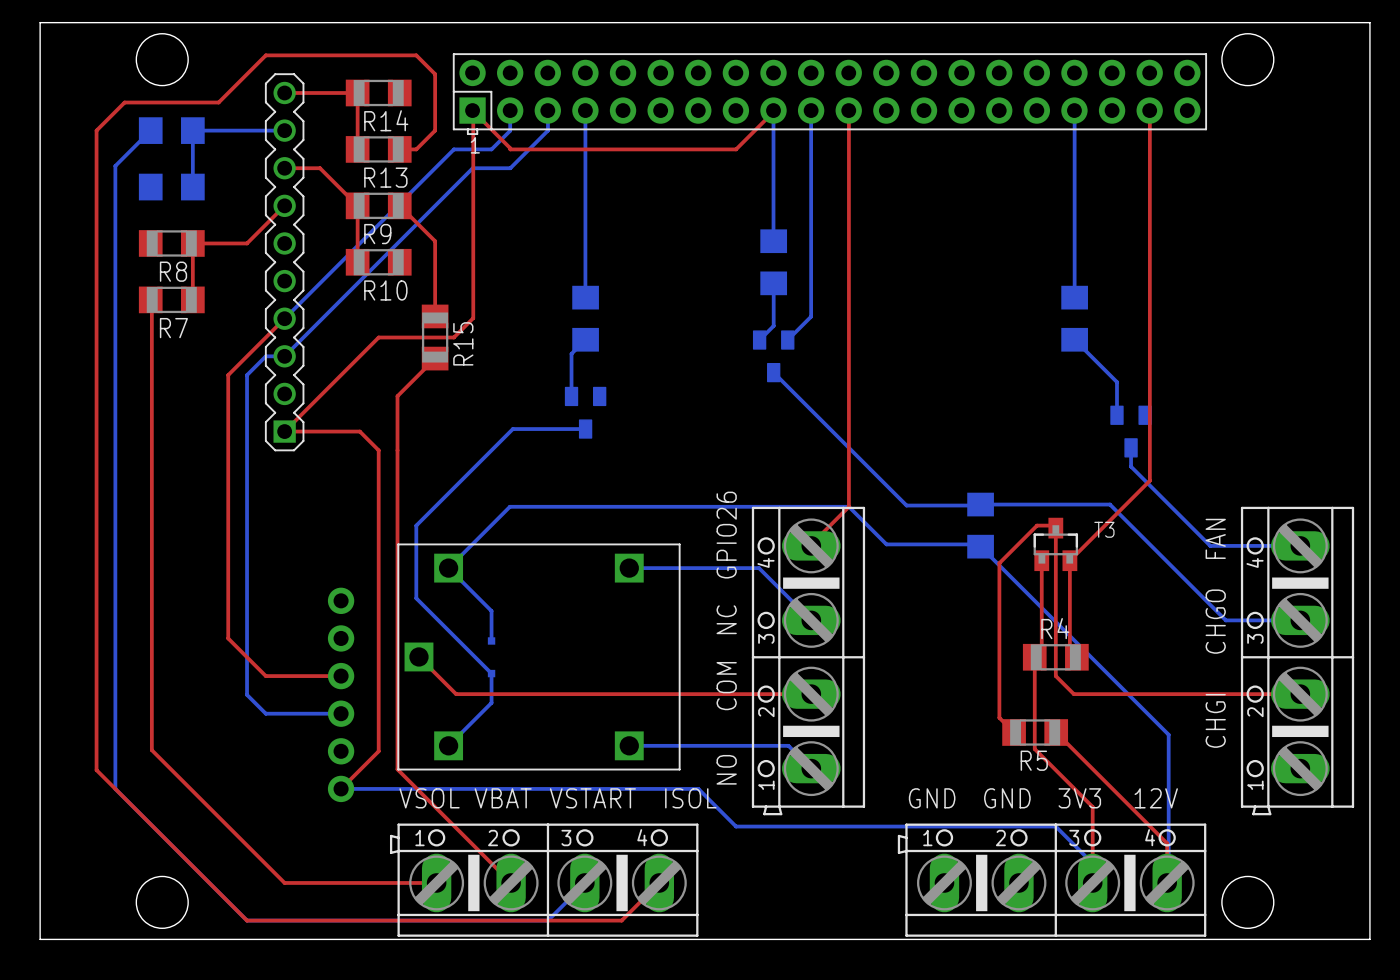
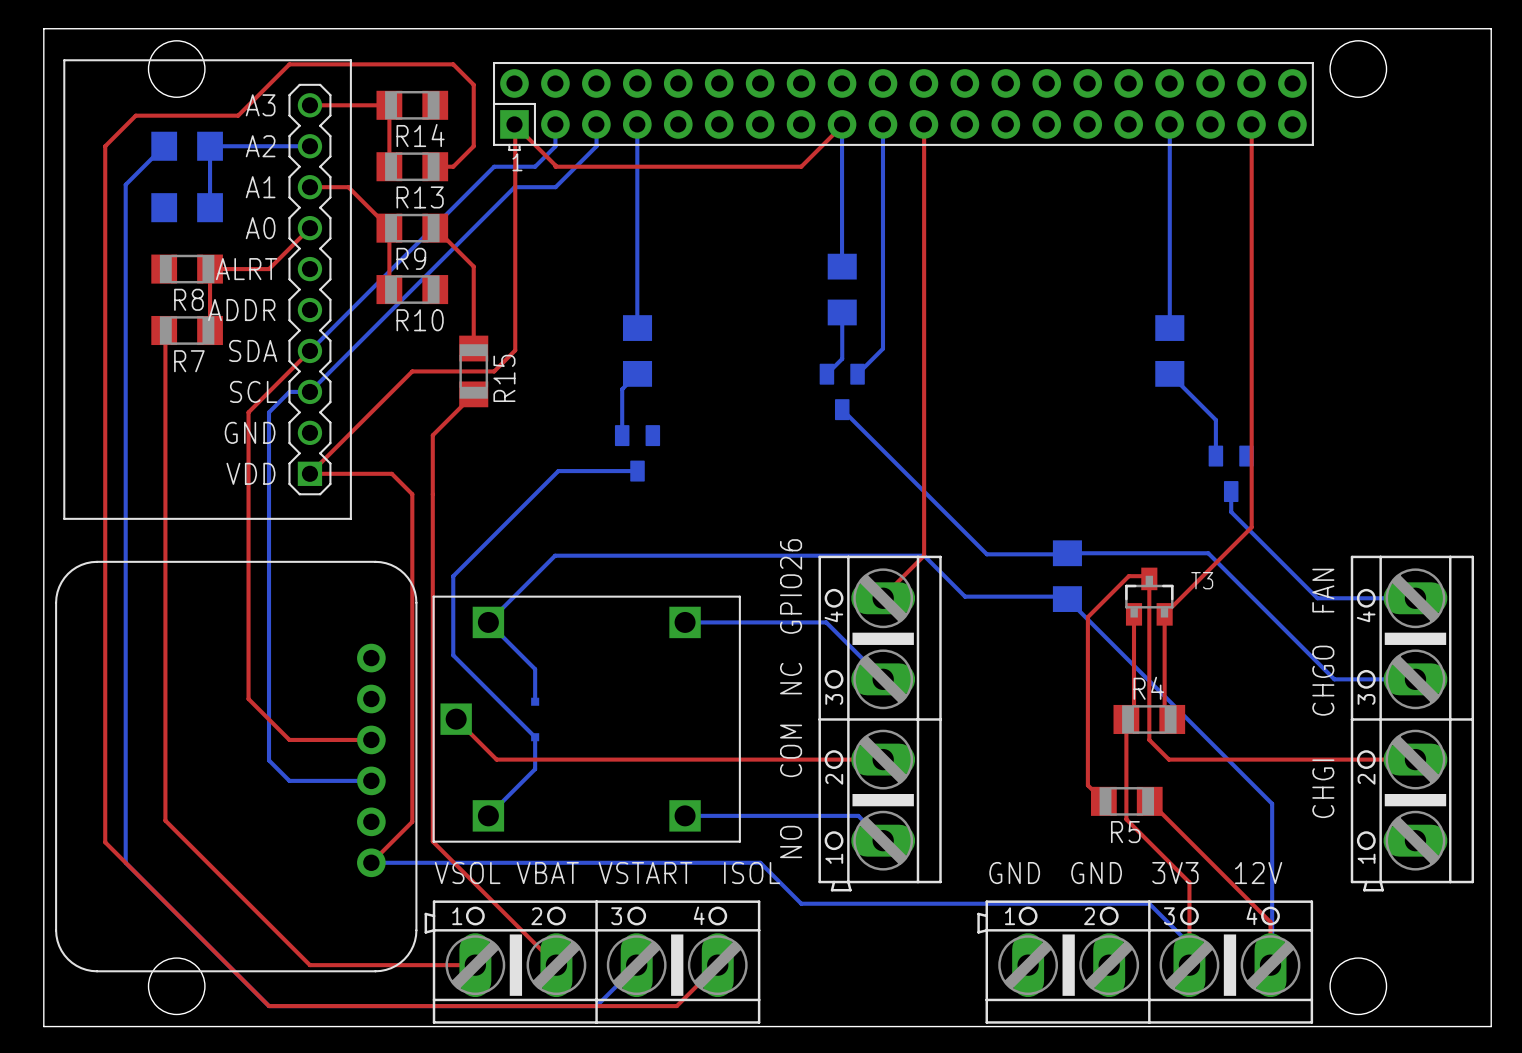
part: none -> (207, 289)
part: none -> (236, 766)

